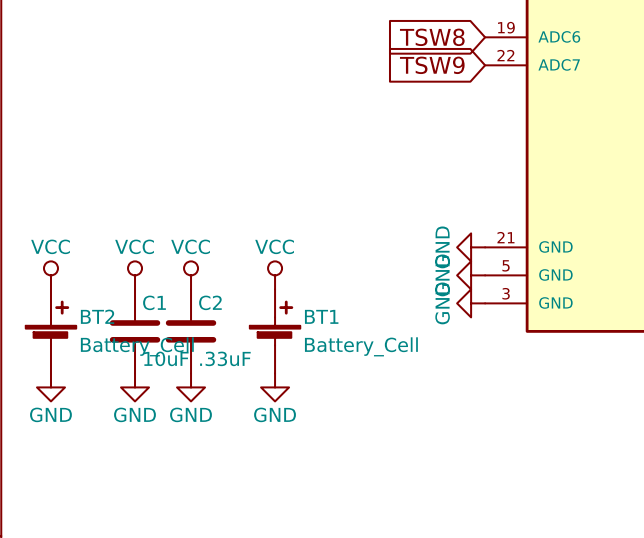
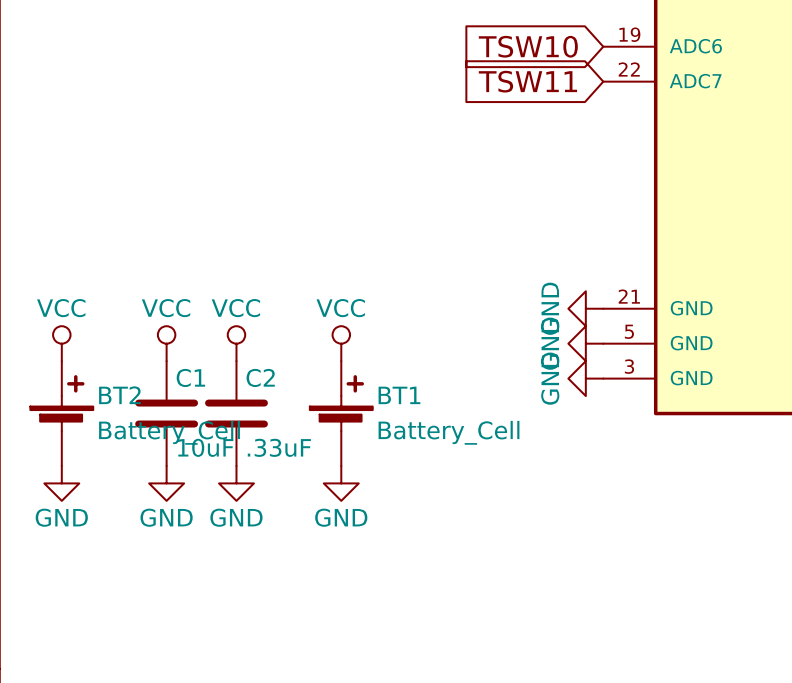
global label: TSW8 (432, 37) -> TSW10 (528, 46)
global label: TSW9 (432, 65) -> TSW11 (527, 81)

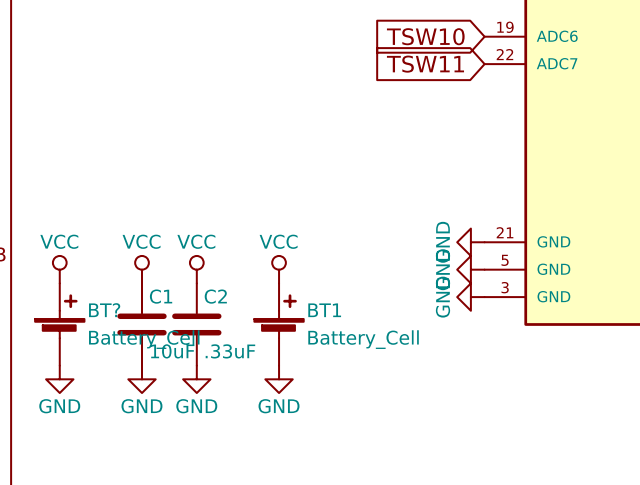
BT2 name: BT2 (119, 395) -> BT? (104, 310)

